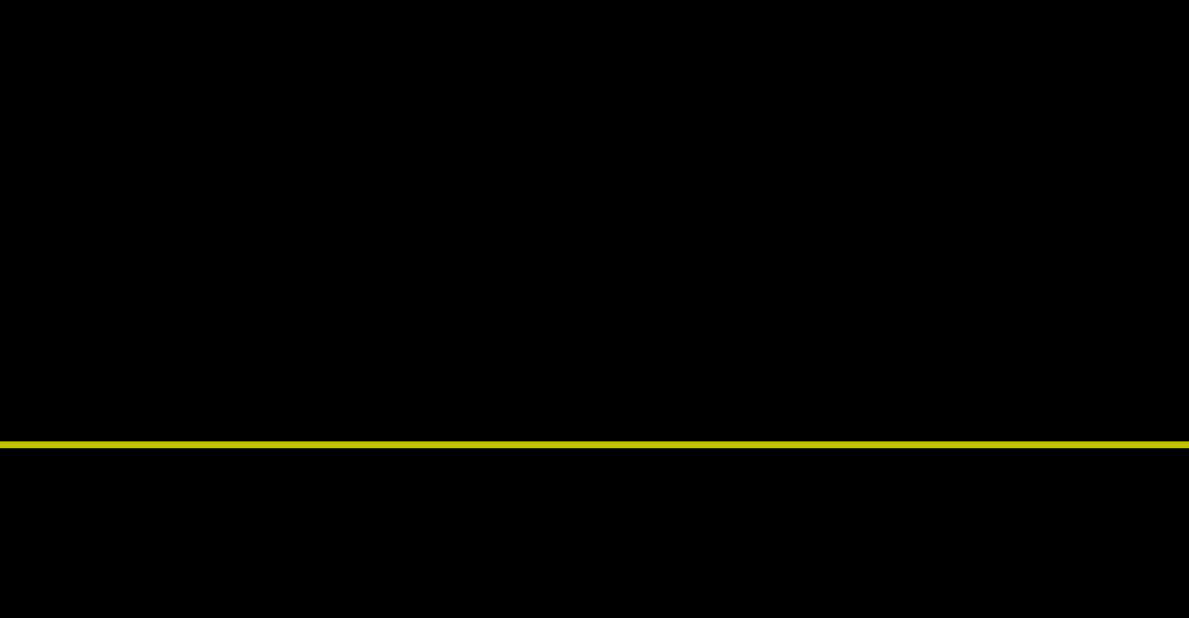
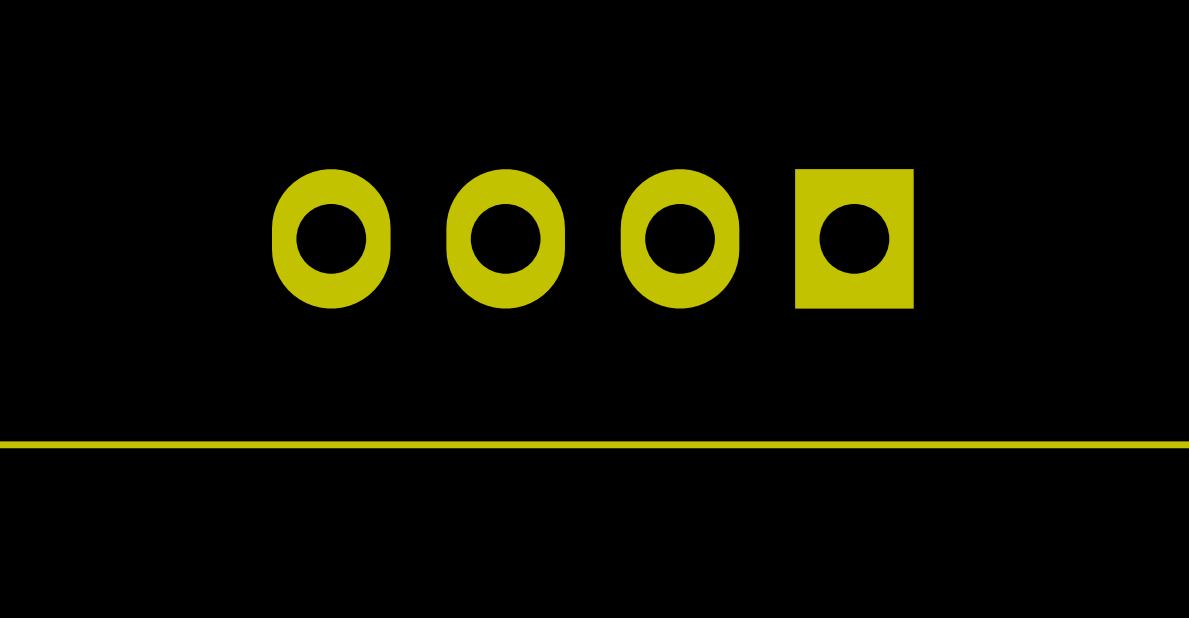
part: none -> (592, 238)

